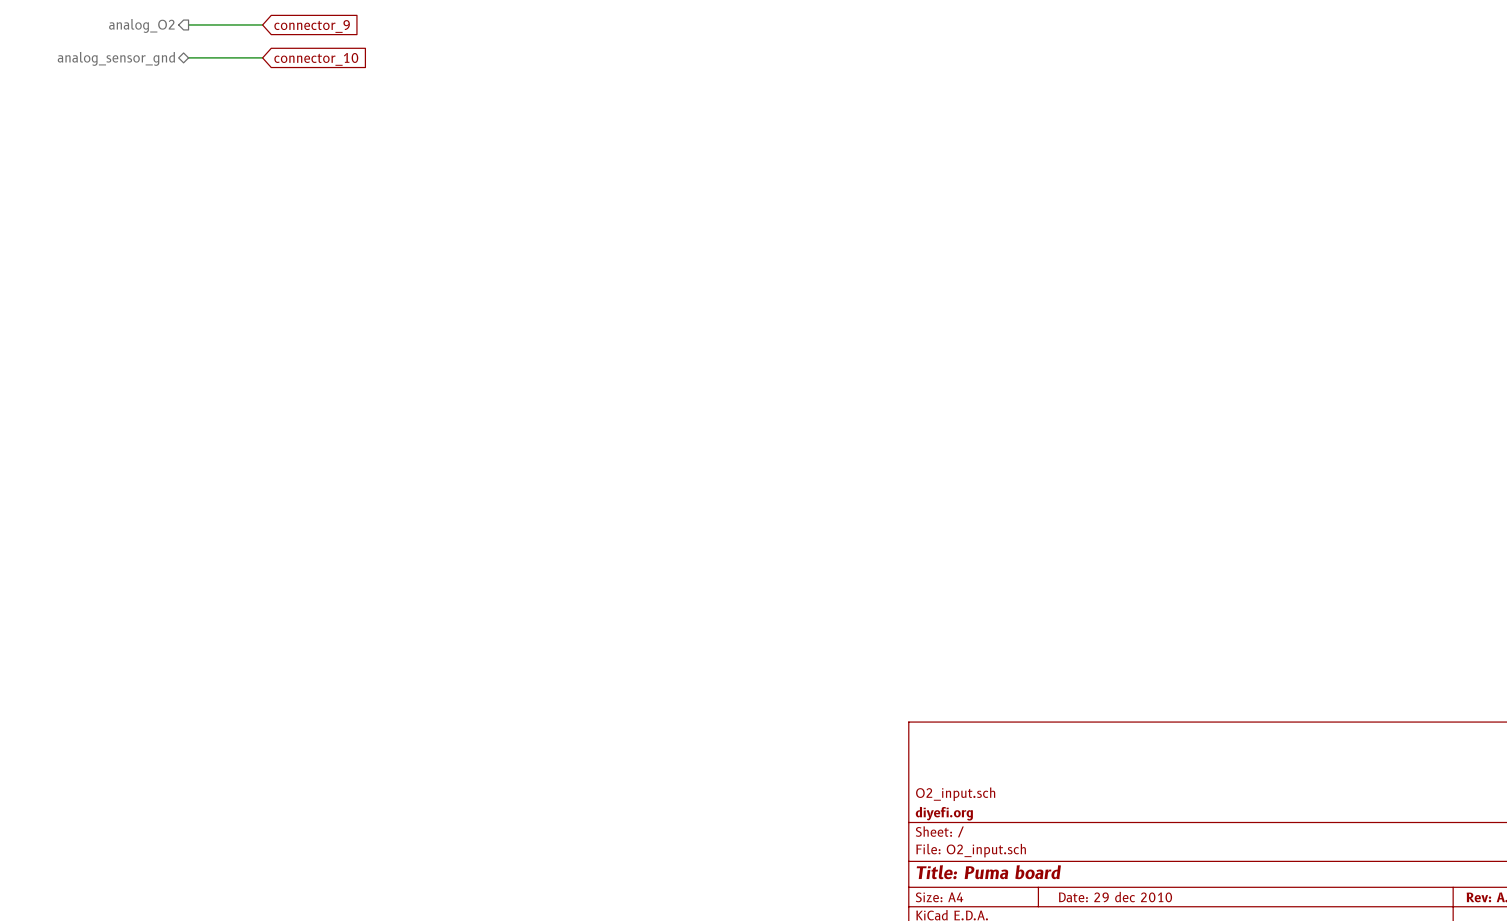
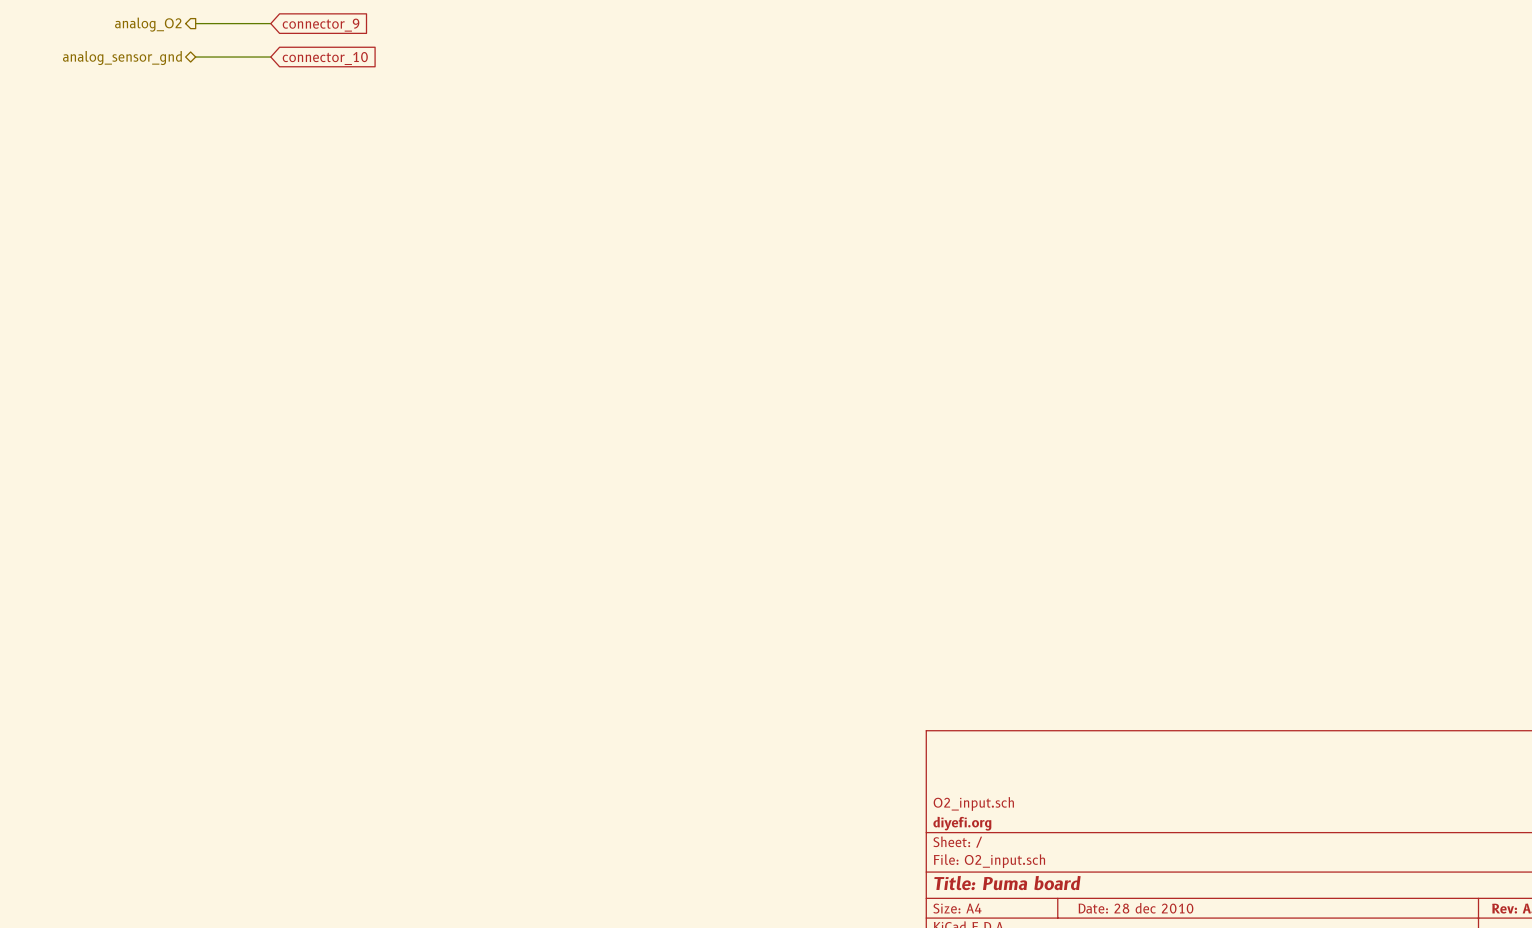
title block: Date: 29 dec 2010 (1115, 897) -> Date: 28 dec 2010 (1135, 908)

